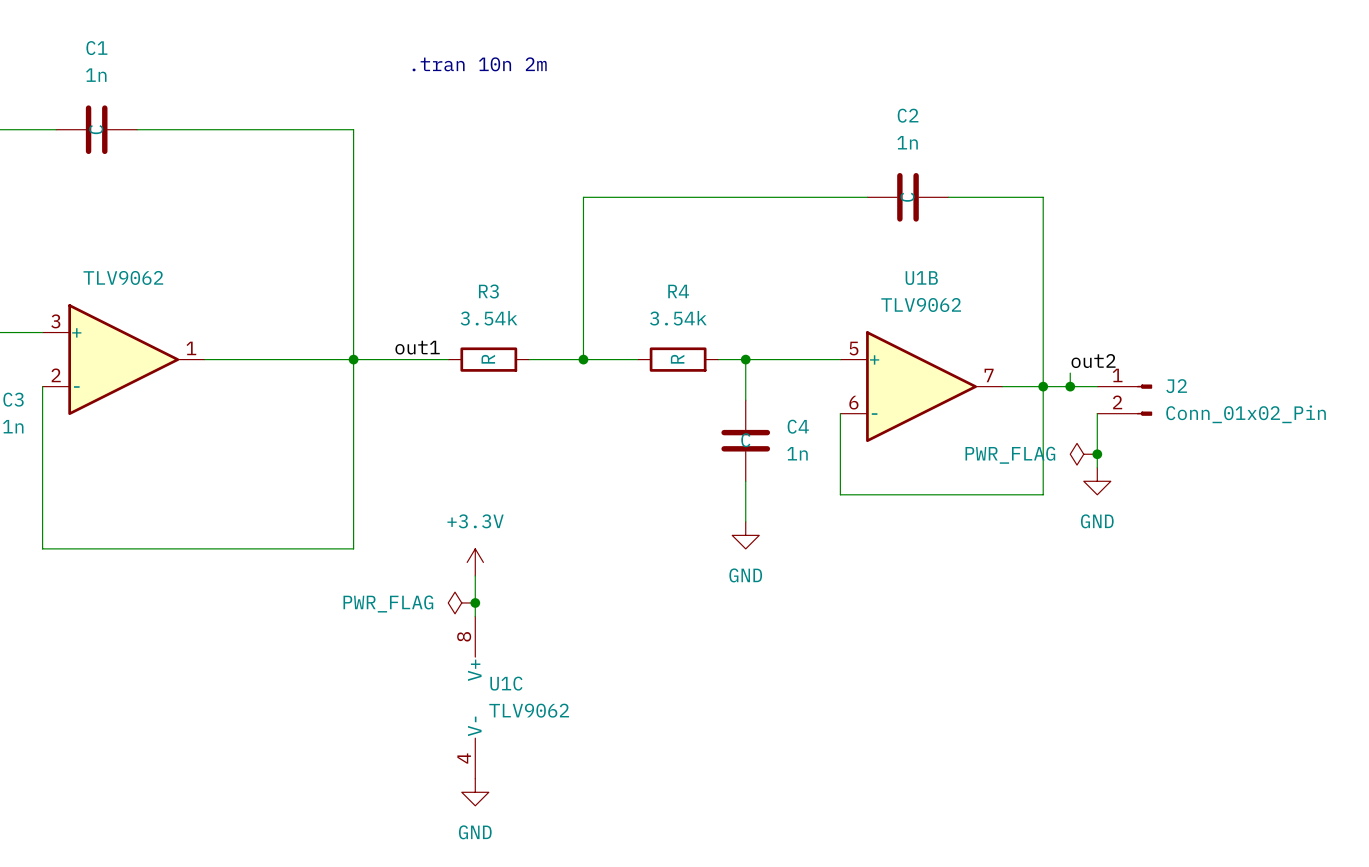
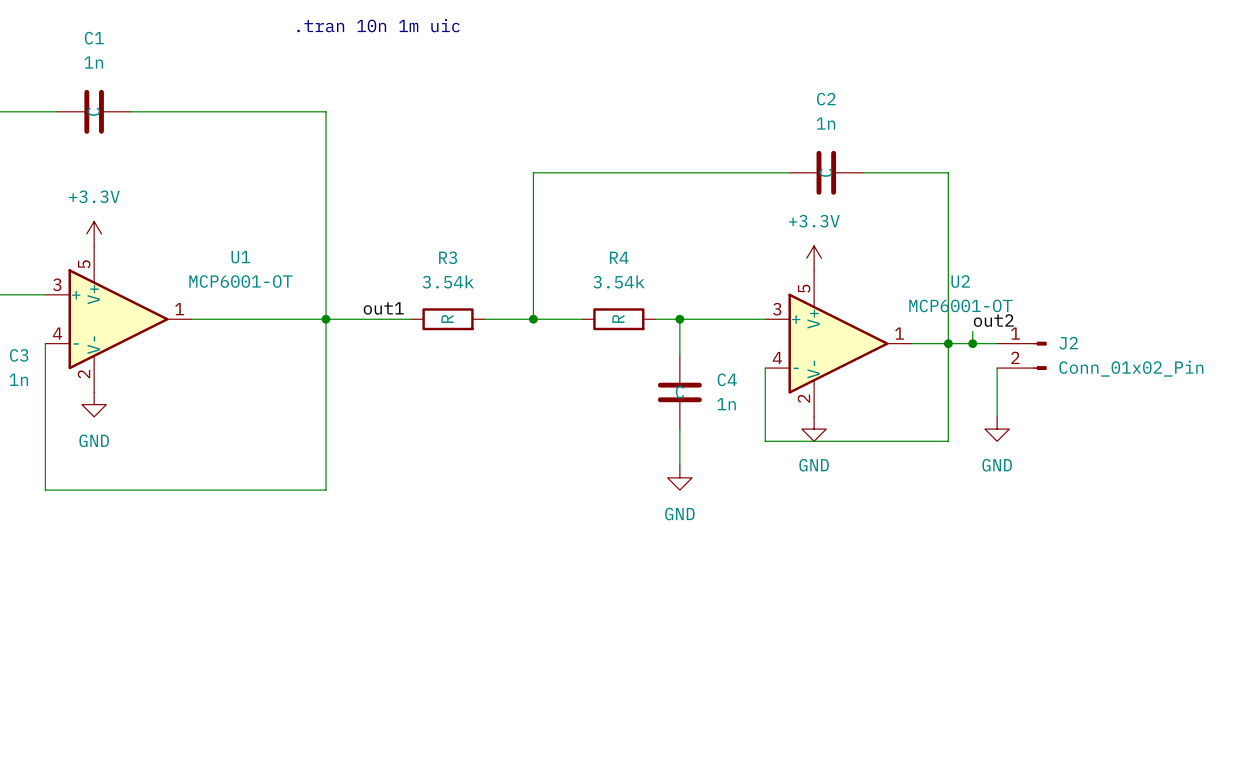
text: none -> .tran 10n 1m uic (378, 25)
text: .tran 10n 2m (479, 64) -> none
power symbol: none -> +3.3V (94, 233)
power symbol: none -> +3.3V (814, 258)
part: TLV9062 (123, 359) -> none
U1: none -> MCP6001-OT (118, 319)
U1B: TLV9062 (921, 386) -> none
U2: none -> MCP6001-OT (838, 343)
power symbol: none -> GND (94, 404)
power symbol: PWR_FLAG (1083, 454) -> none
junction: (1097, 454) -> none
power symbol: none -> GND (814, 429)
power symbol: +3.3V (475, 562) -> none
wire: (475, 575) (475, 616) -> none
power symbol: PWR_FLAG (461, 602) -> none
junction: (475, 602) -> none
U1C: TLV9062 (475, 697) -> none
power symbol: GND (475, 792) -> none

